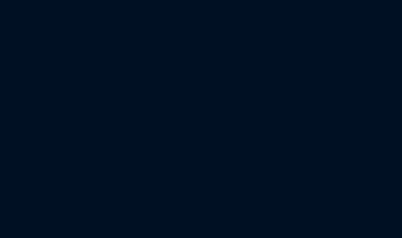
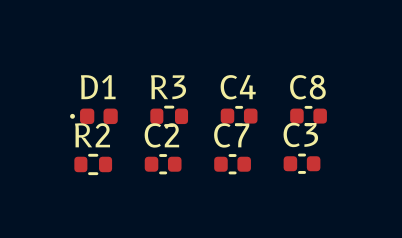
D1: none -> (93, 116)
R3: none -> (169, 116)
C4: none -> (239, 116)
C8: none -> (308, 116)
C3: none -> (302, 163)
R2: none -> (93, 164)
C2: none -> (163, 164)
C7: none -> (232, 164)

